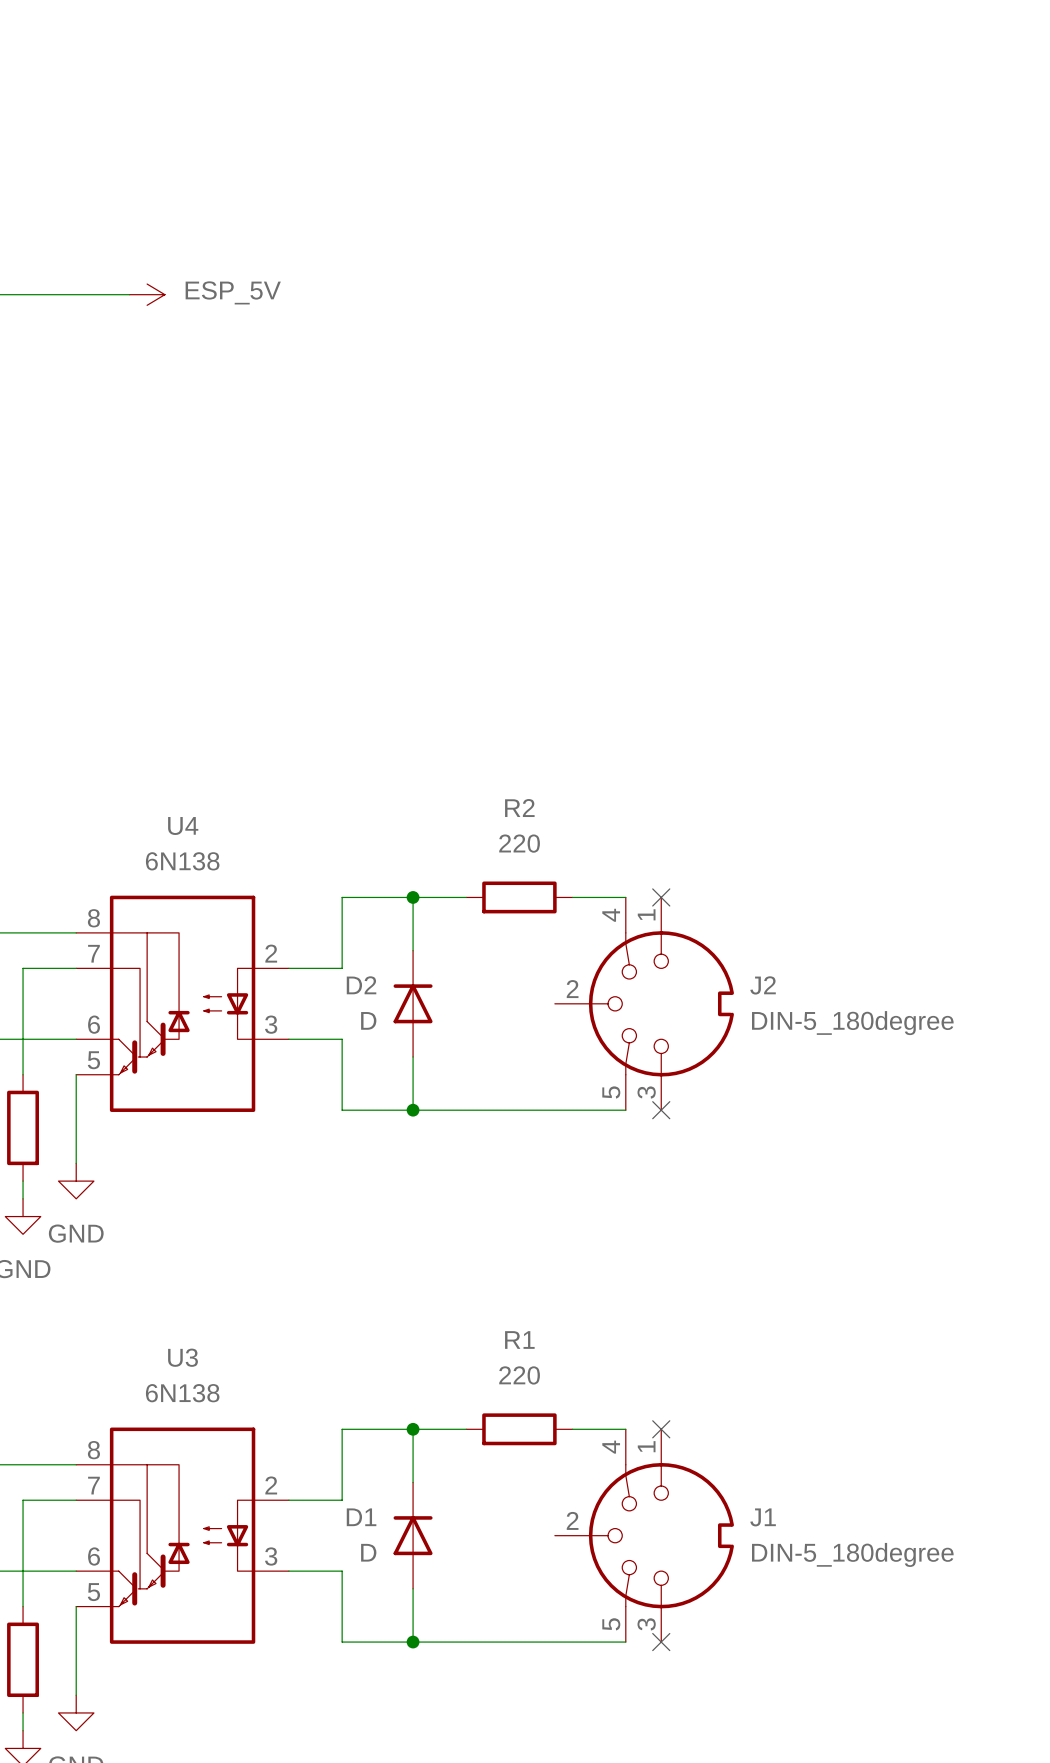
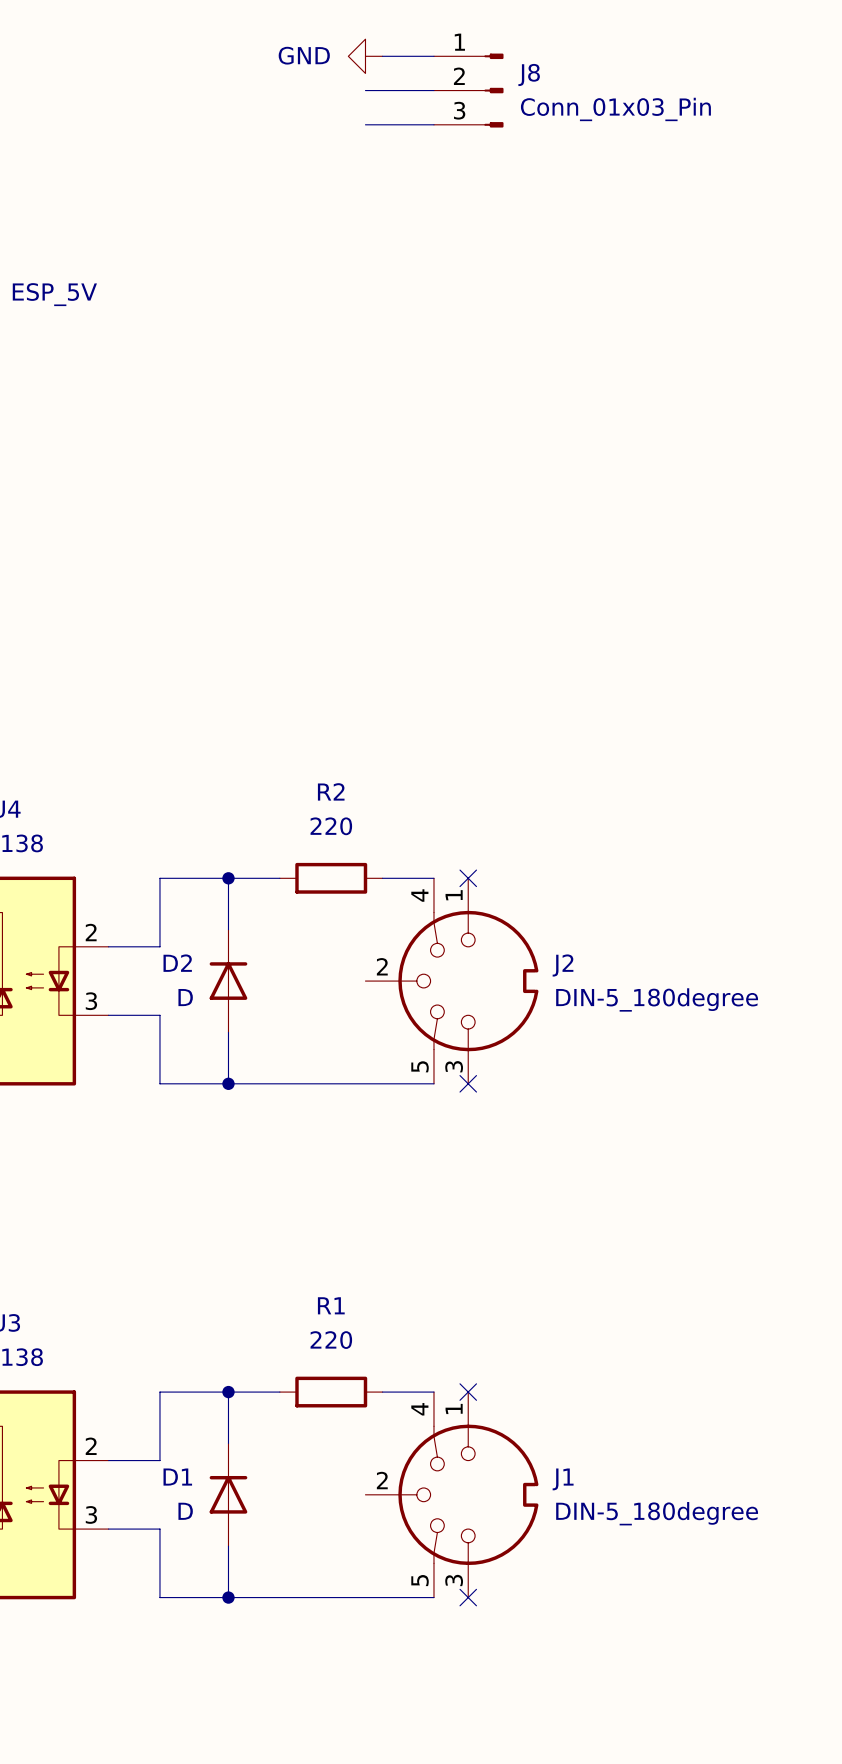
power symbol: none -> GND (365, 56)
wire: none -> (382, 56) (433, 56)
wire: none -> (365, 90) (433, 90)
J8: none -> Conn_01x03_Pin (468, 90)
wire: none -> (365, 124) (433, 124)

